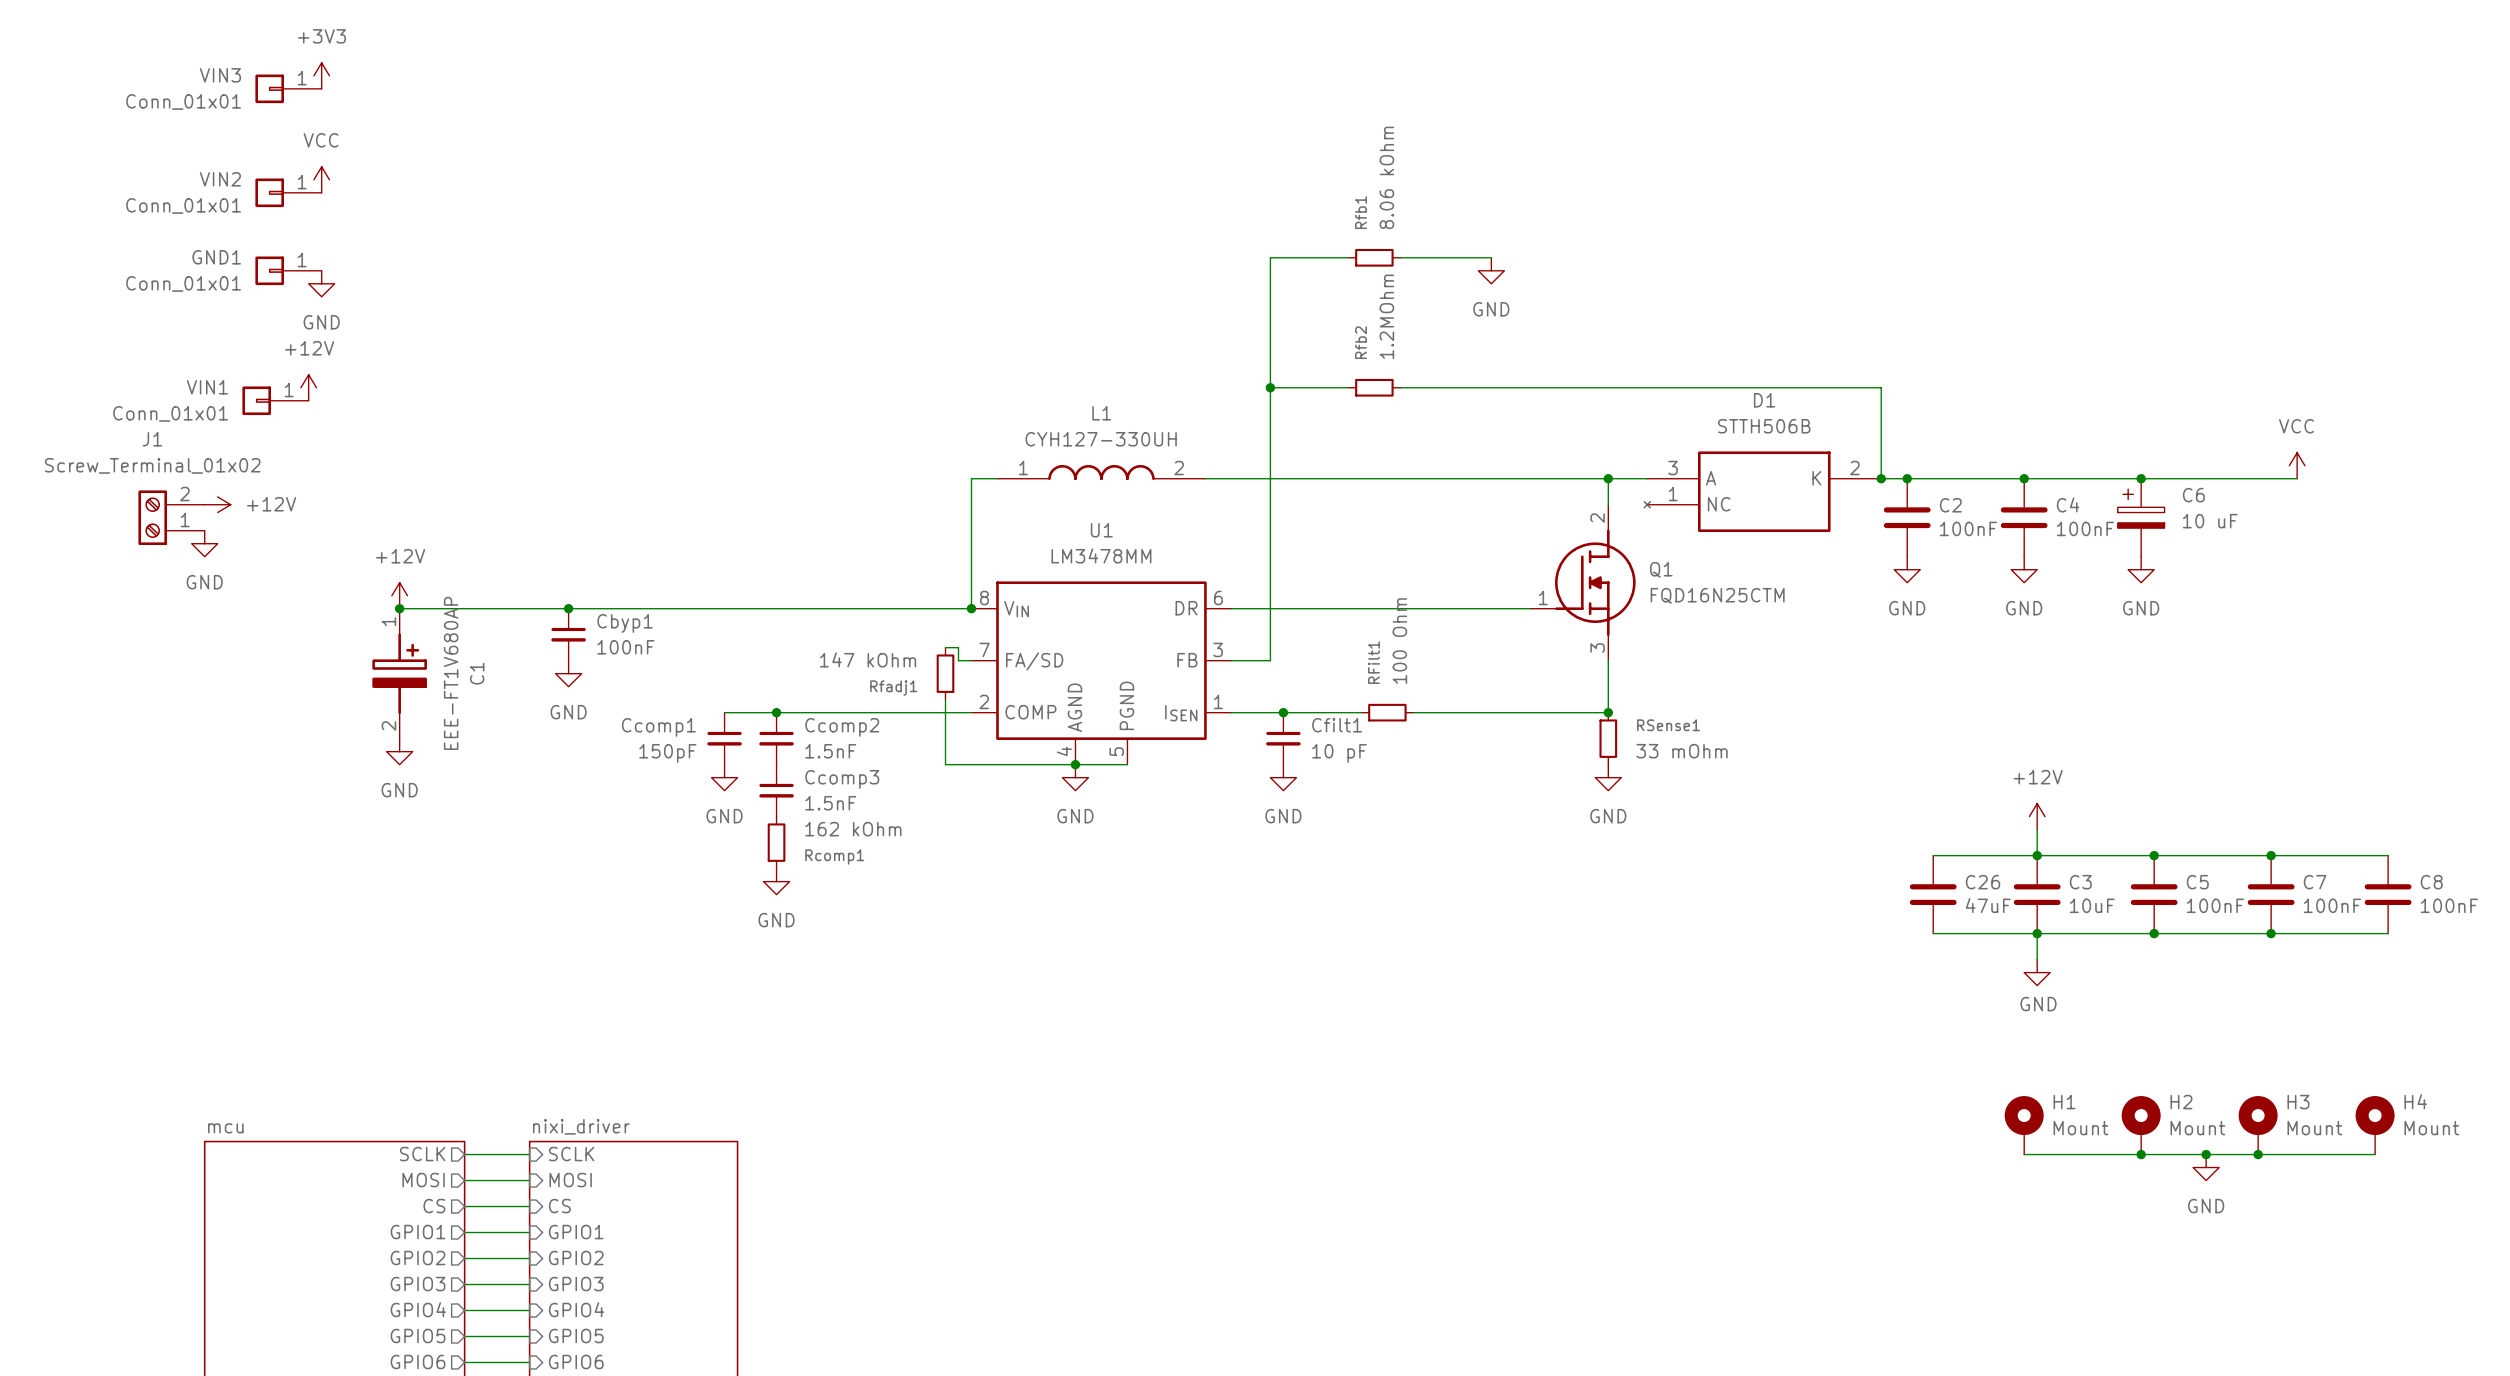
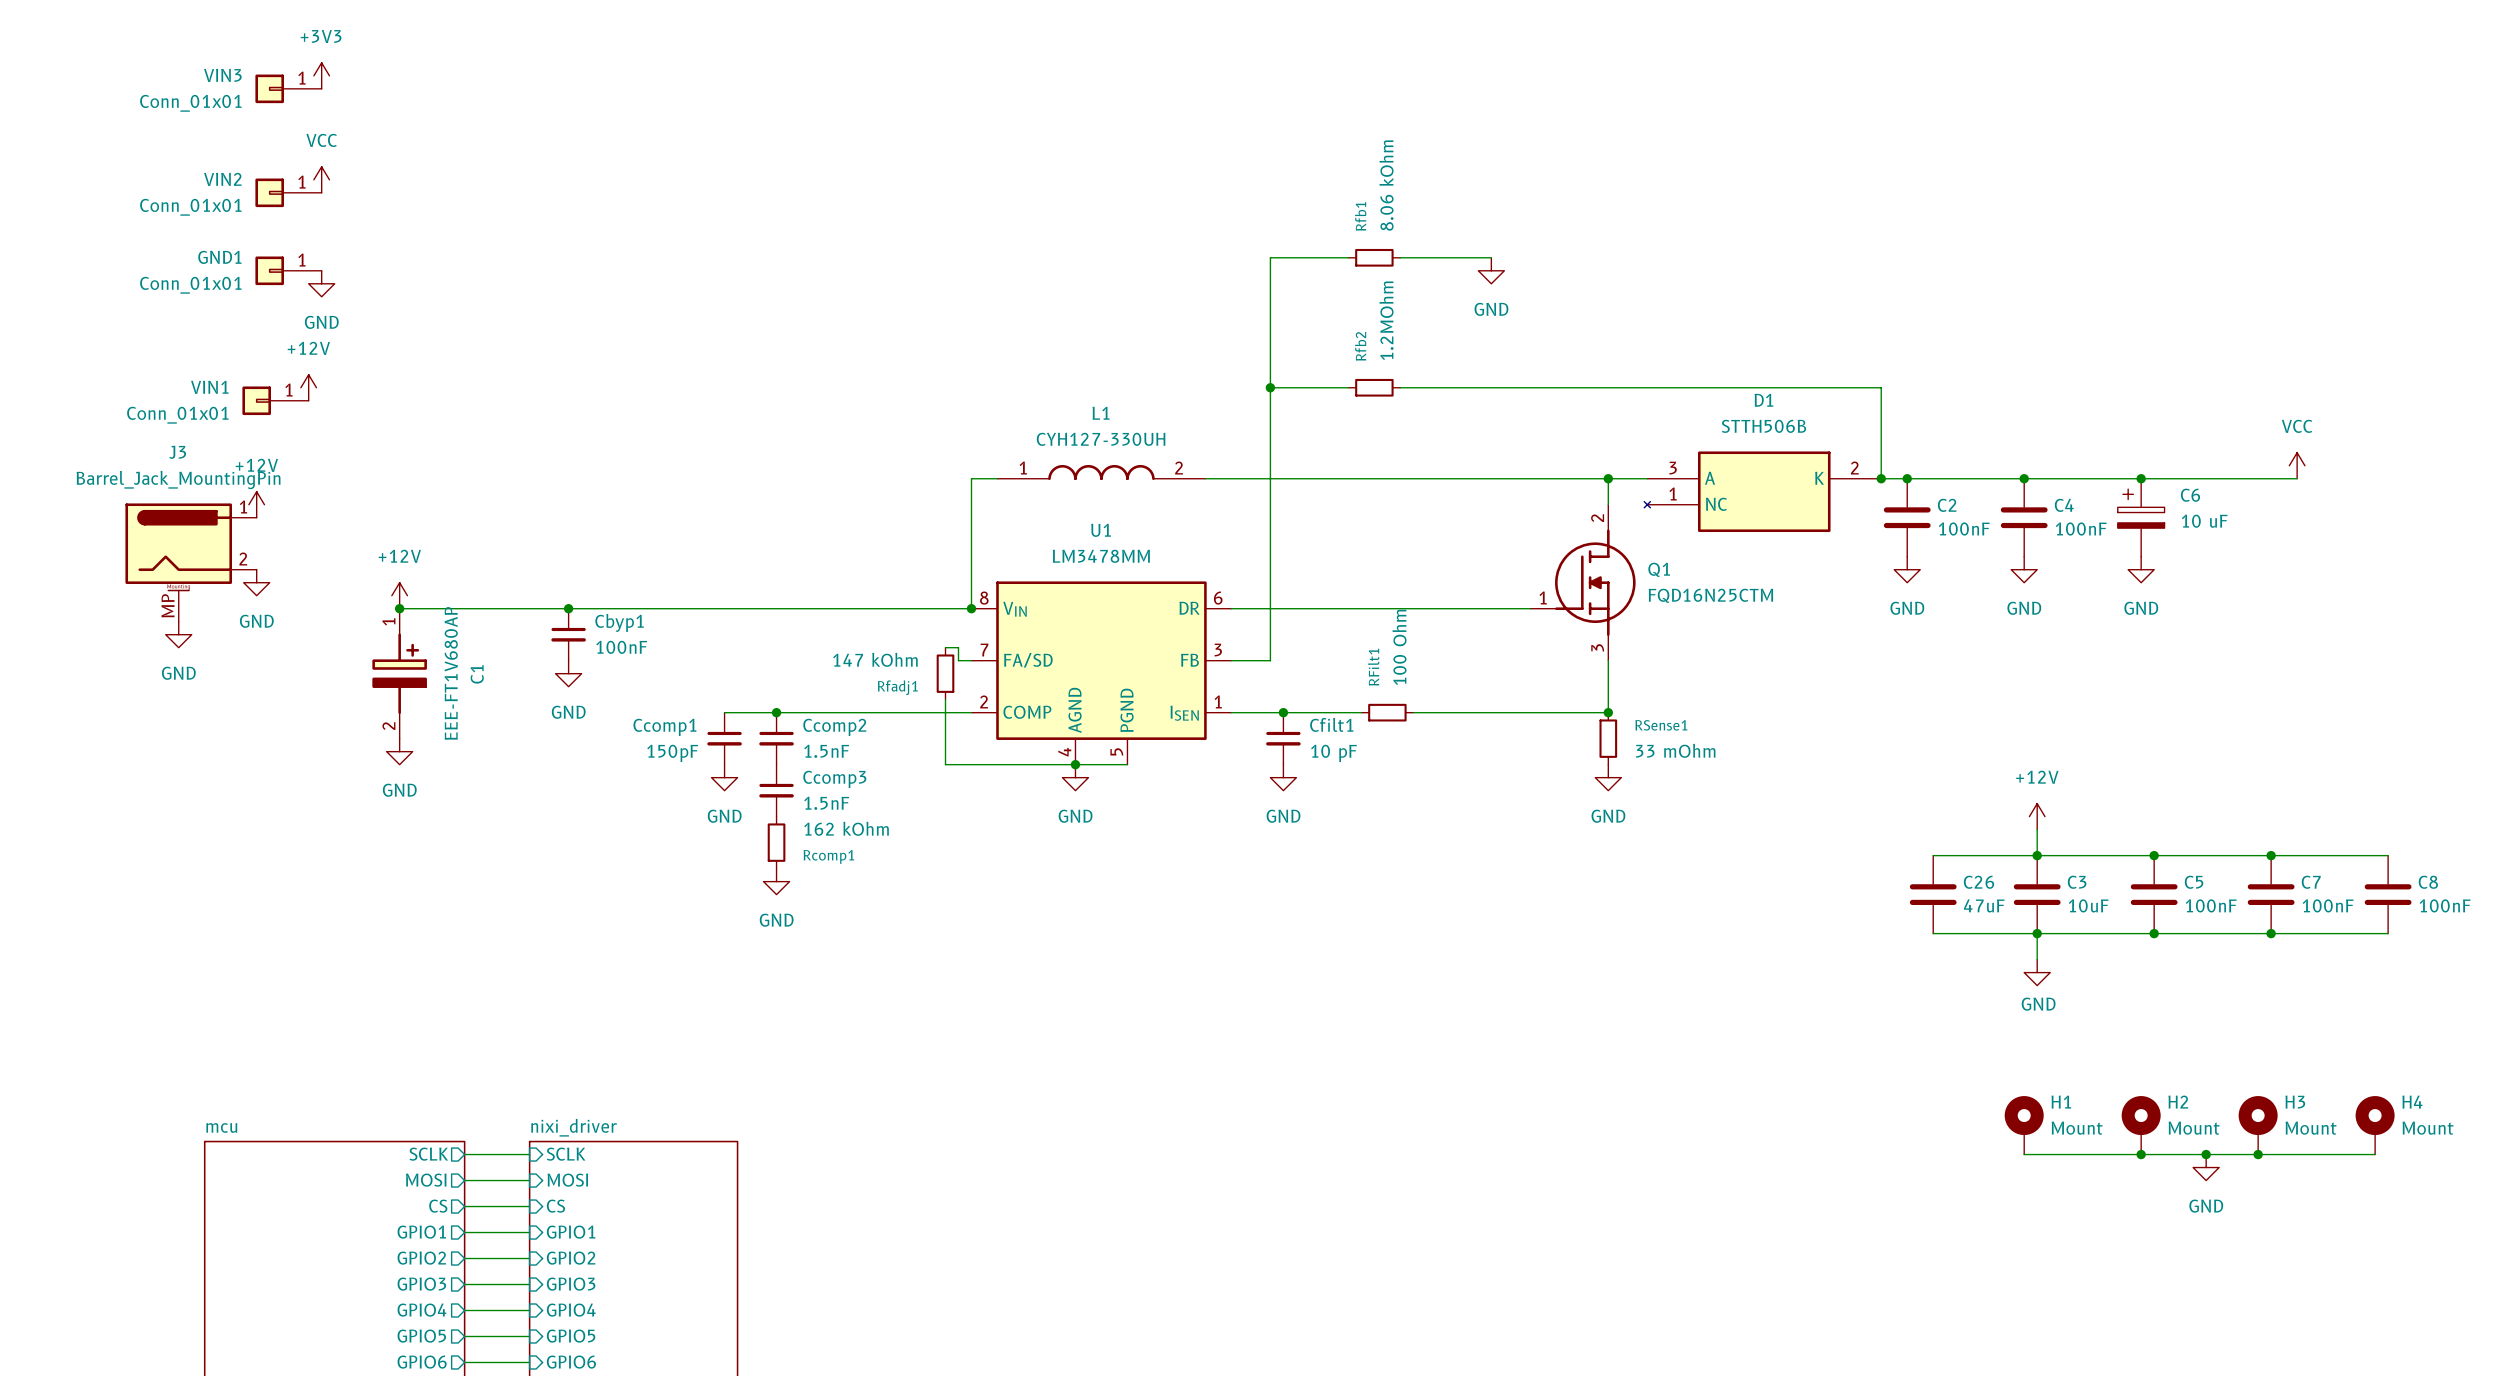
power symbol rotation: 0° (217, 504) -> 90° counterclockwise (256, 504)
power symbol position: +12V (217, 504) -> +12V (256, 504)
J1: Screw_Terminal_01x02 (171, 517) -> none
power symbol: GND (204, 543) -> none
J3: none -> Barrel_Jack_MountingPin (191, 562)
power symbol: none -> GND (256, 582)
power symbol: none -> GND (178, 634)

